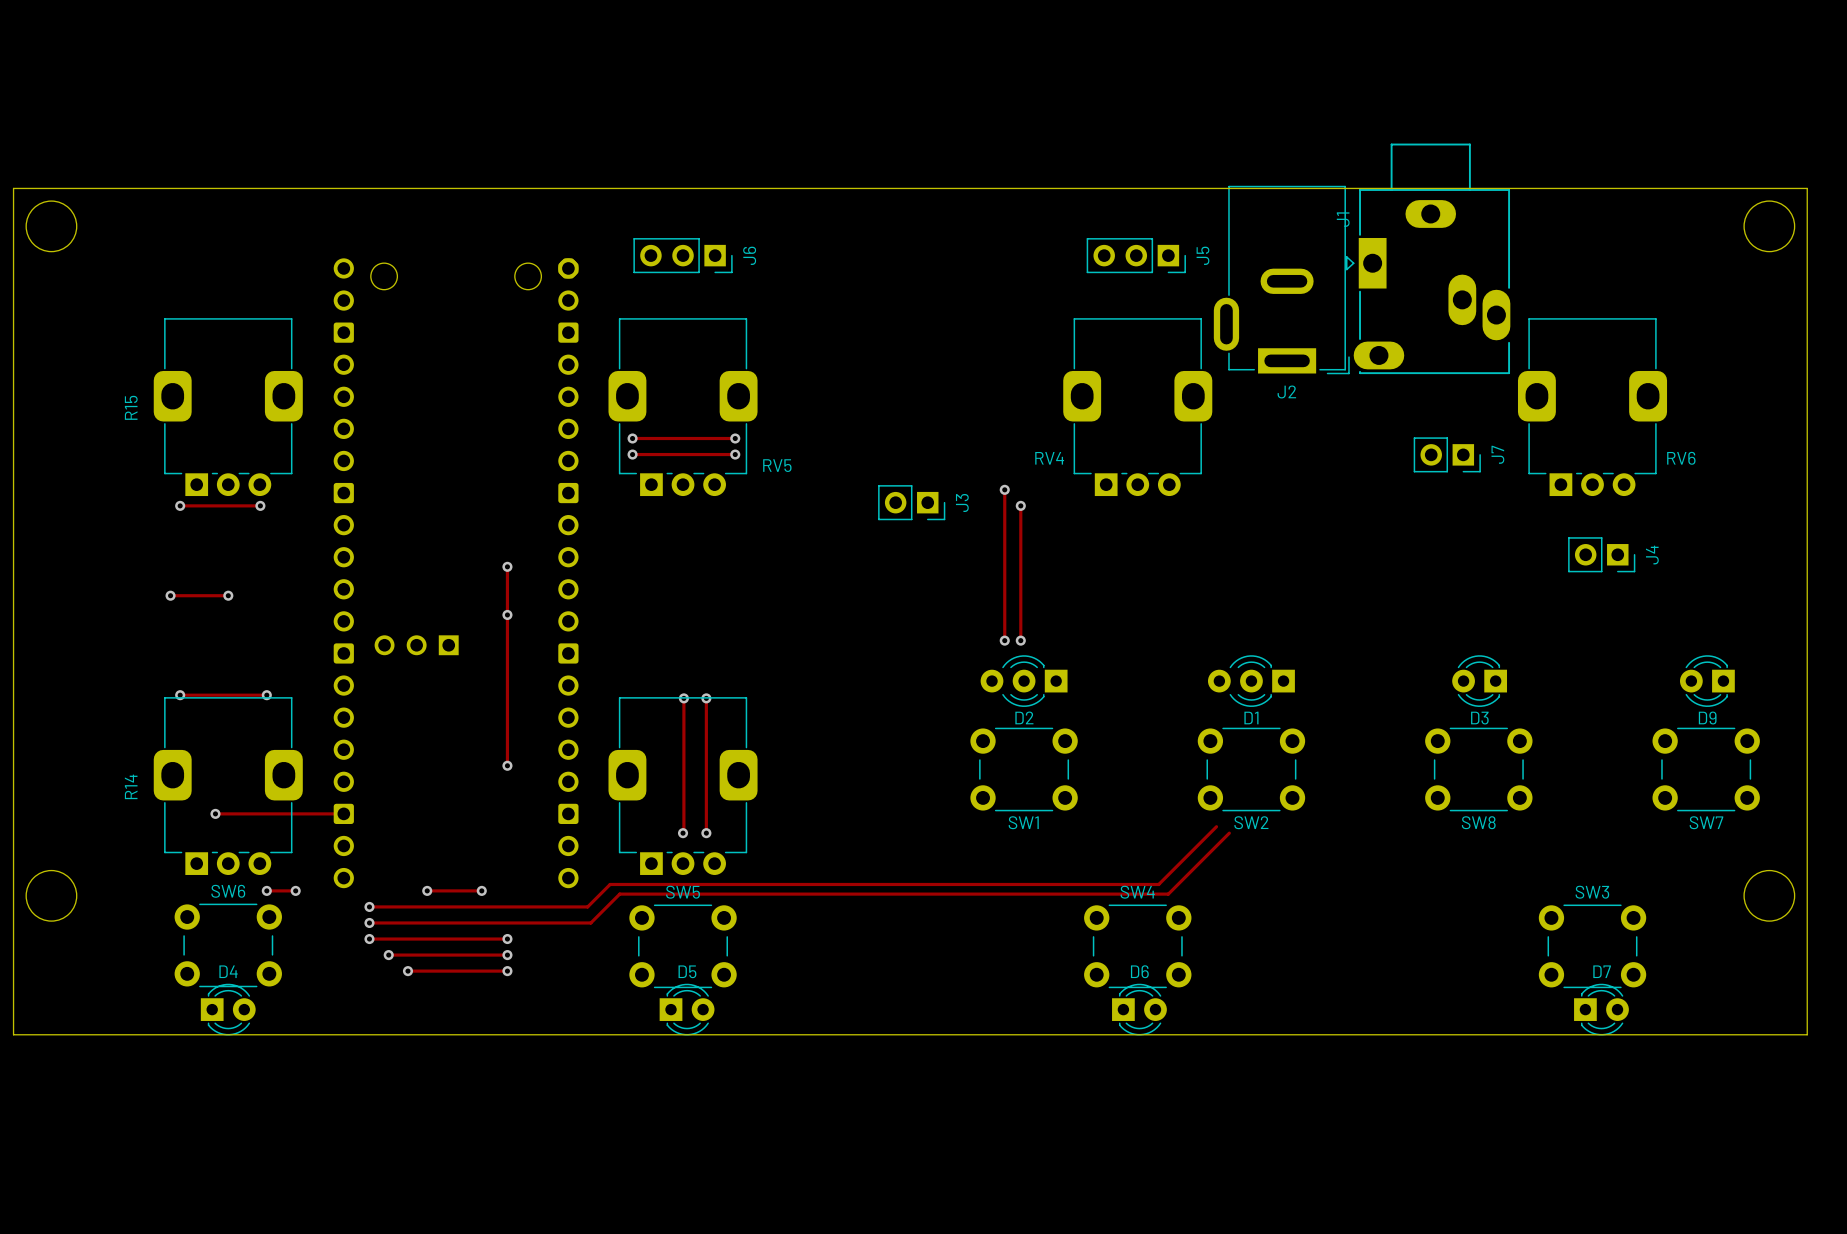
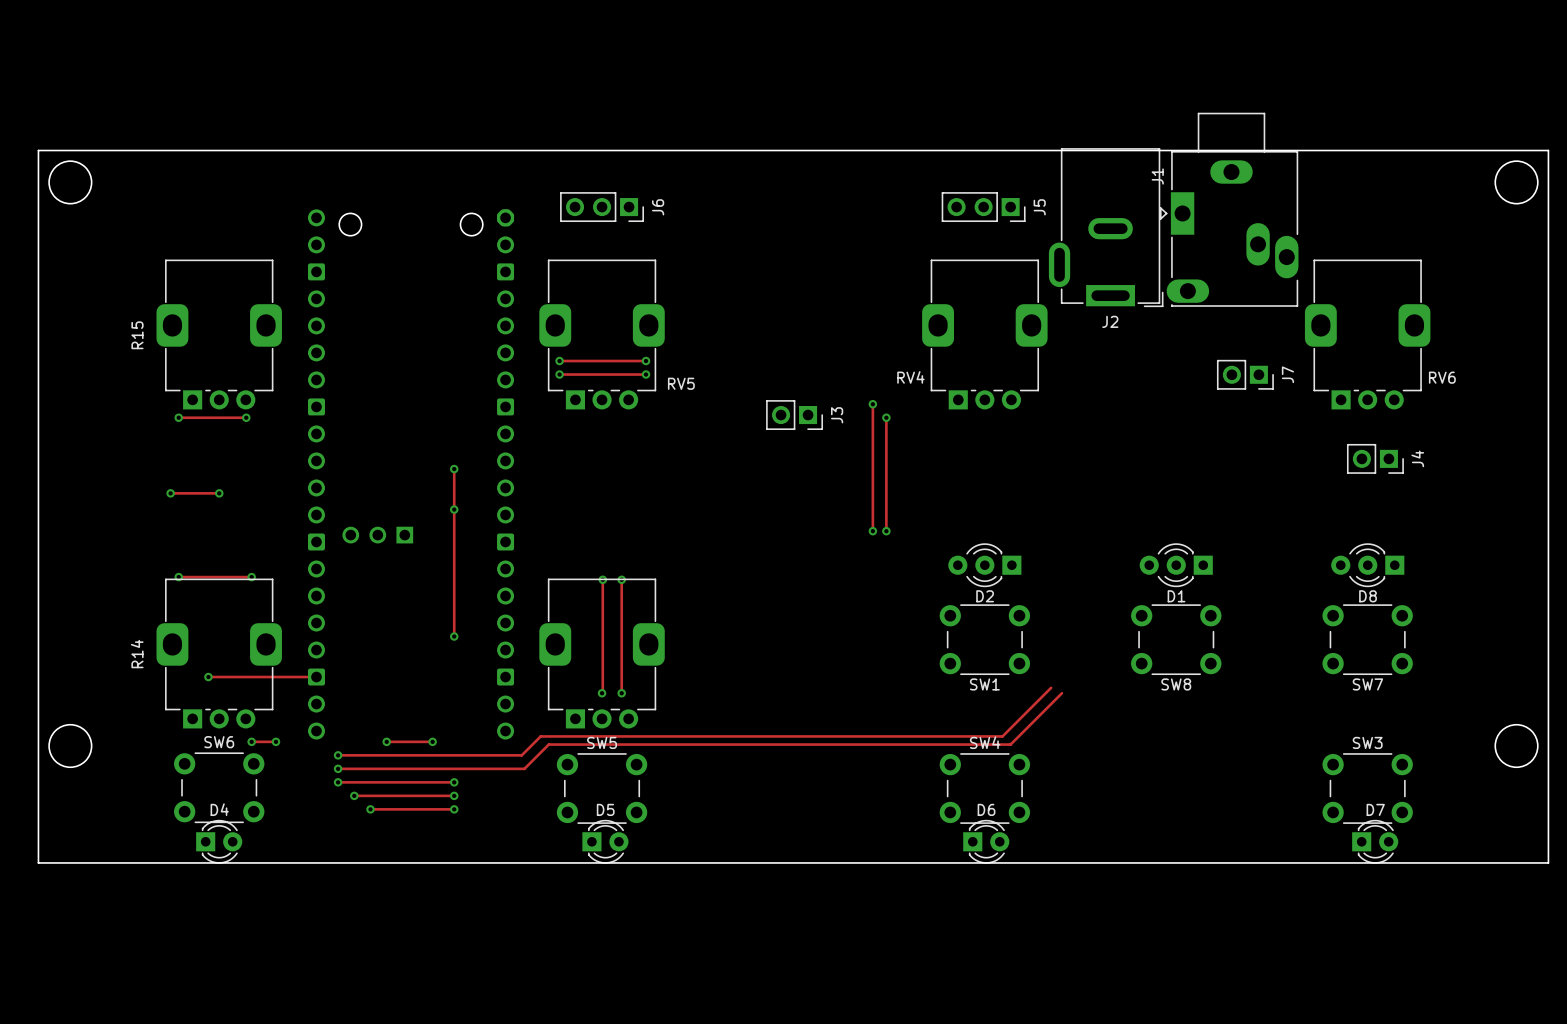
D2 position: (1024, 681) -> (984, 565)
D1 position: (1251, 681) -> (1176, 565)
D3: (1479, 681) -> none
D8: none -> (1367, 565)
D9: (1707, 681) -> none
SW1 position: (1024, 769) -> (984, 639)
SW2: (1251, 769) -> none
SW8 position: (1478, 769) -> (1176, 639)
SW7 position: (1706, 769) -> (1367, 639)

